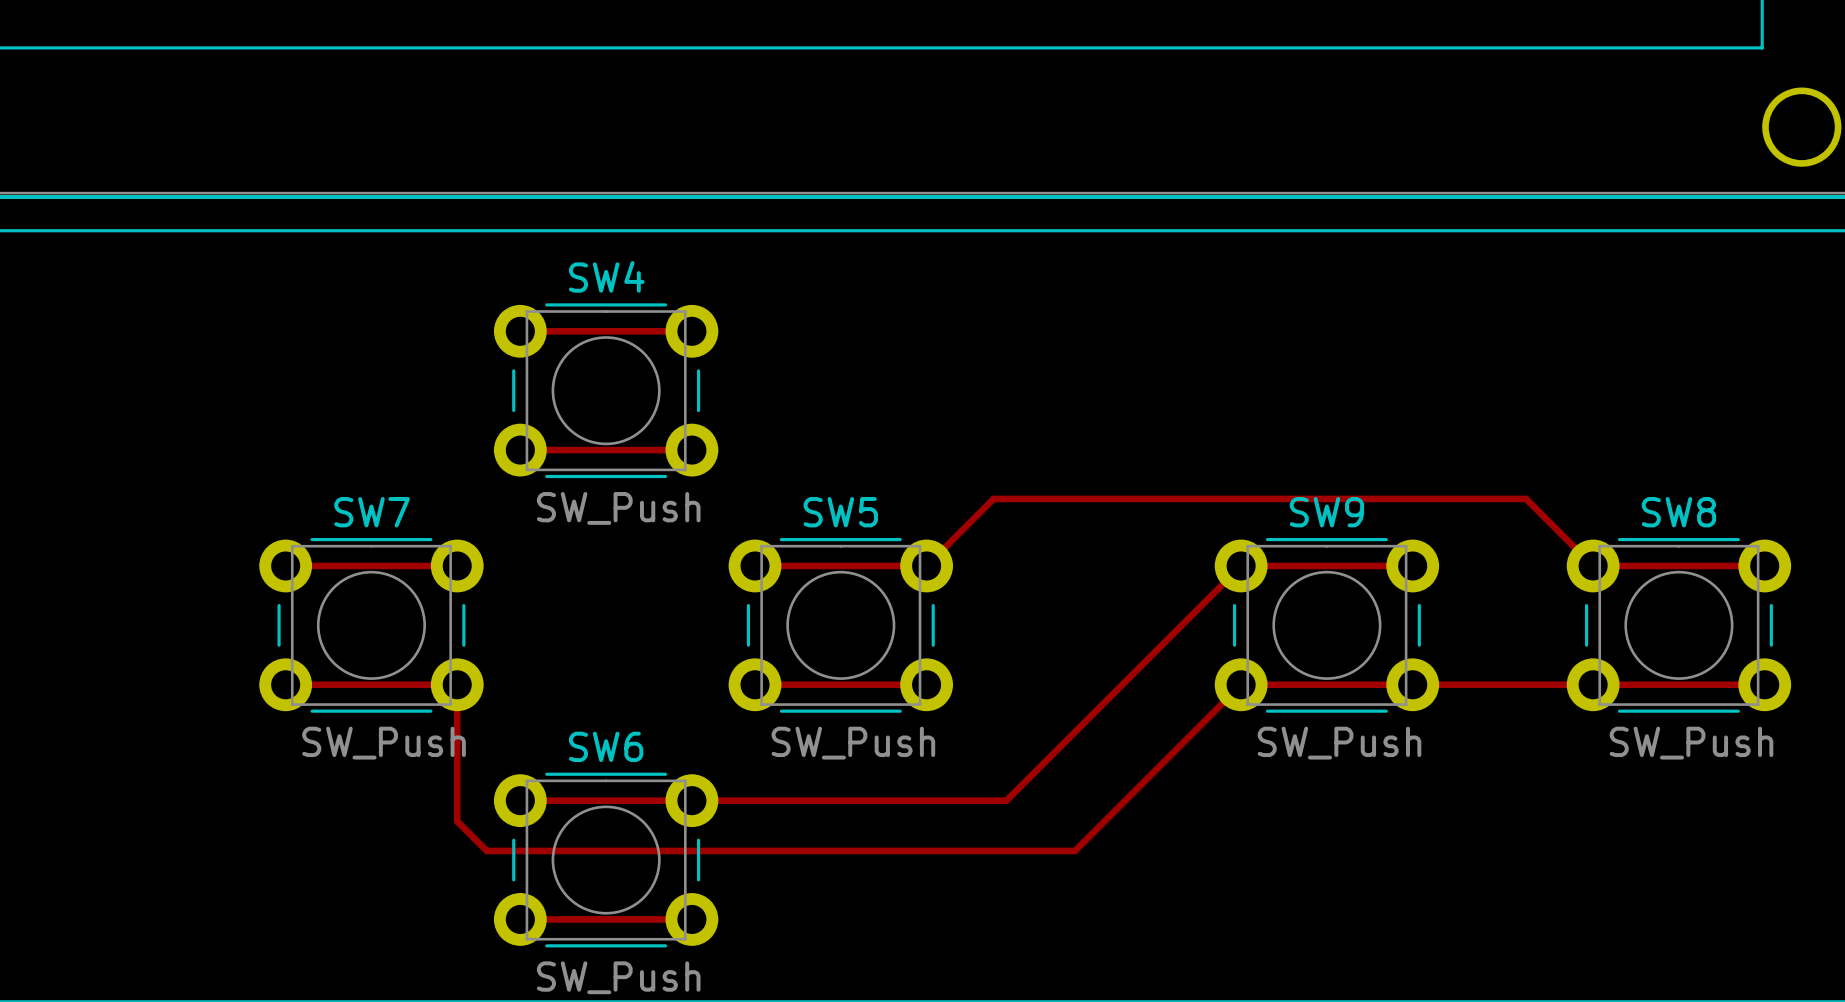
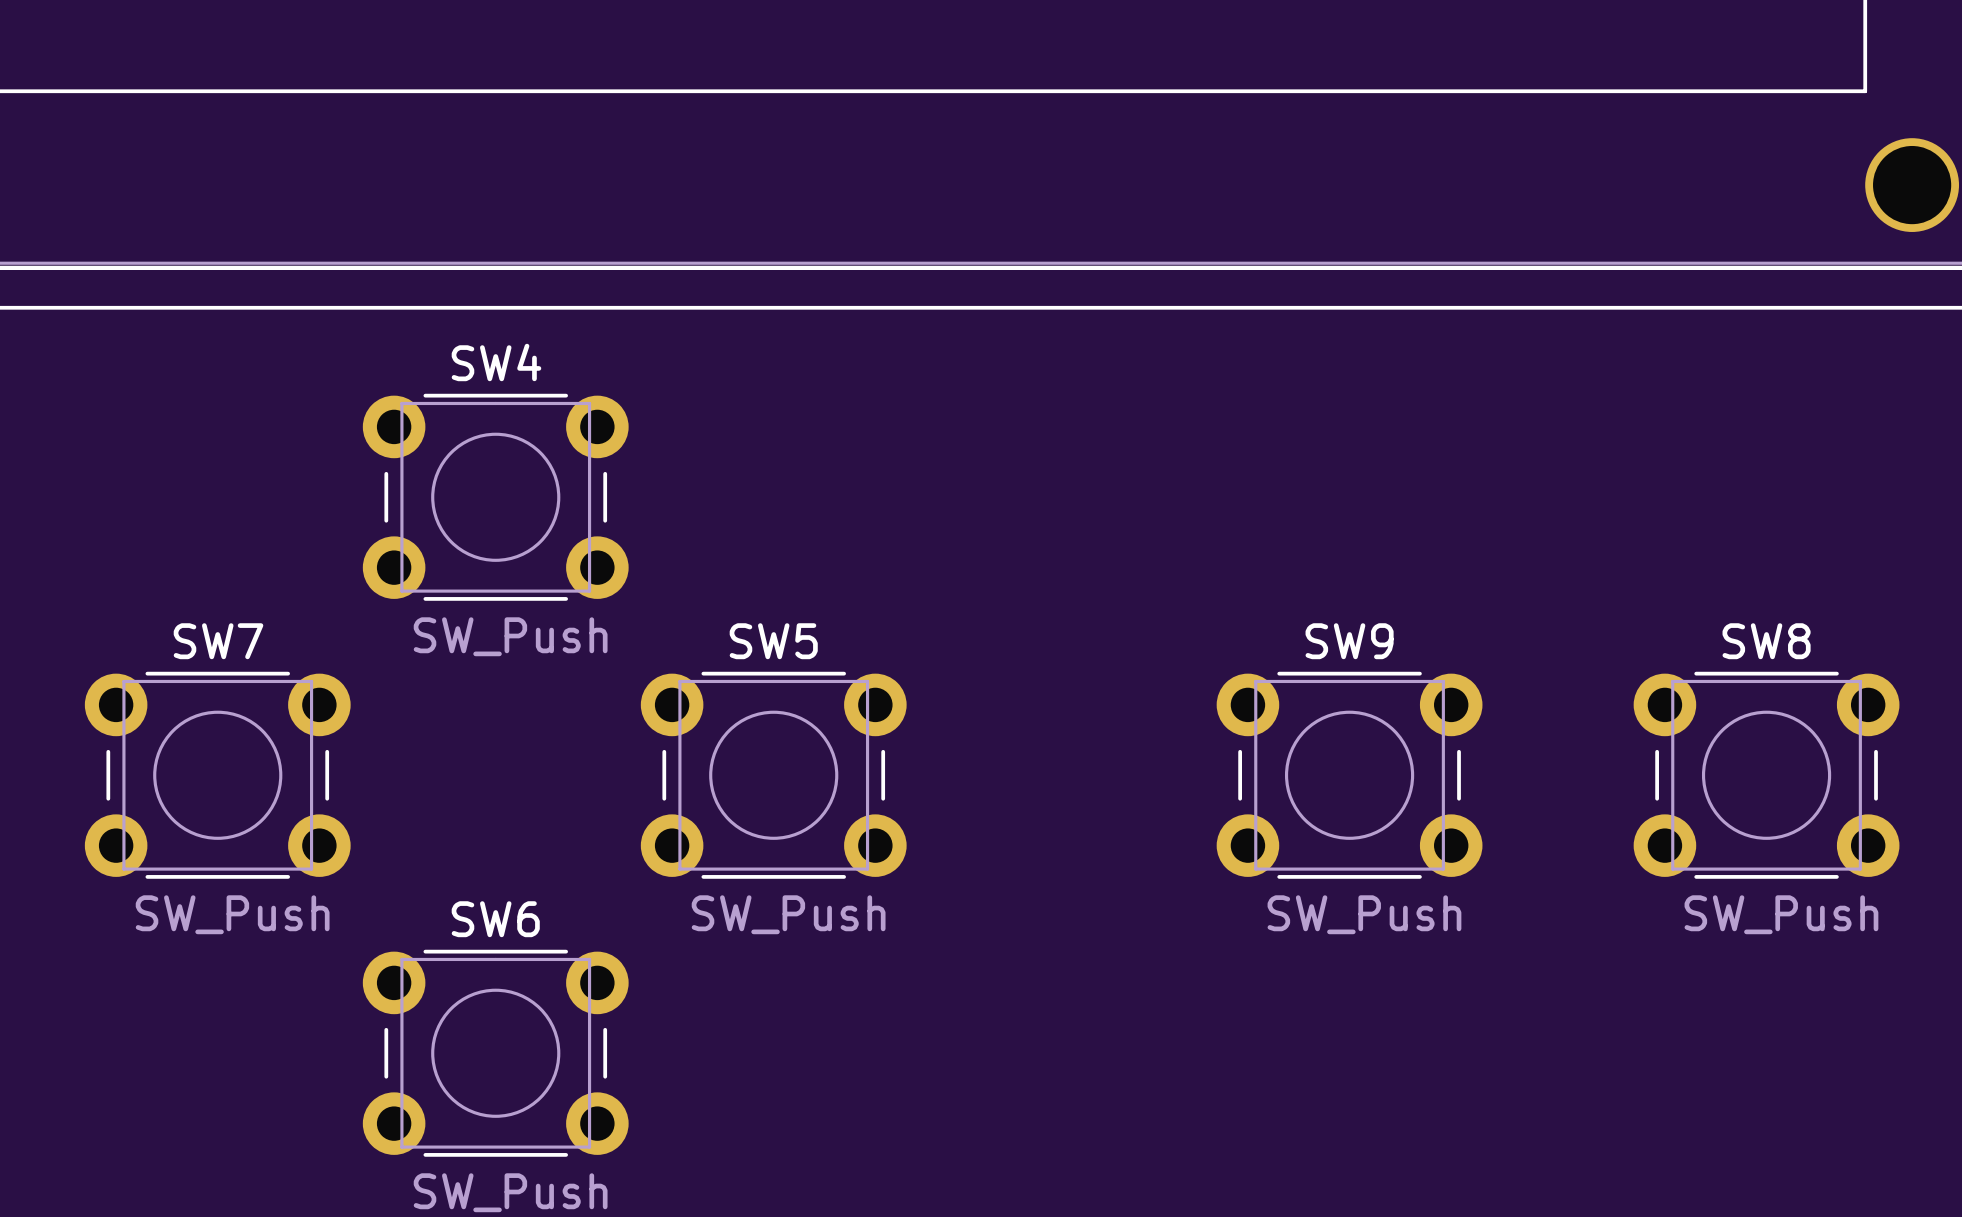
track: (520, 331) (691, 331) -> none
track: (520, 450) (691, 450) -> none
track: (285, 565) (457, 565) -> none
track: (755, 565) (926, 565) (993, 498) (1526, 498) (1593, 565) (1764, 565) -> none
track: (1412, 565) (1241, 565) (1006, 800) (520, 800) -> none
track: (285, 684) (457, 684) (457, 821) (486, 850) (1074, 850) (1241, 684) (1764, 684) -> none
track: (755, 684) (926, 684) -> none
track: (520, 919) (691, 919) -> none

